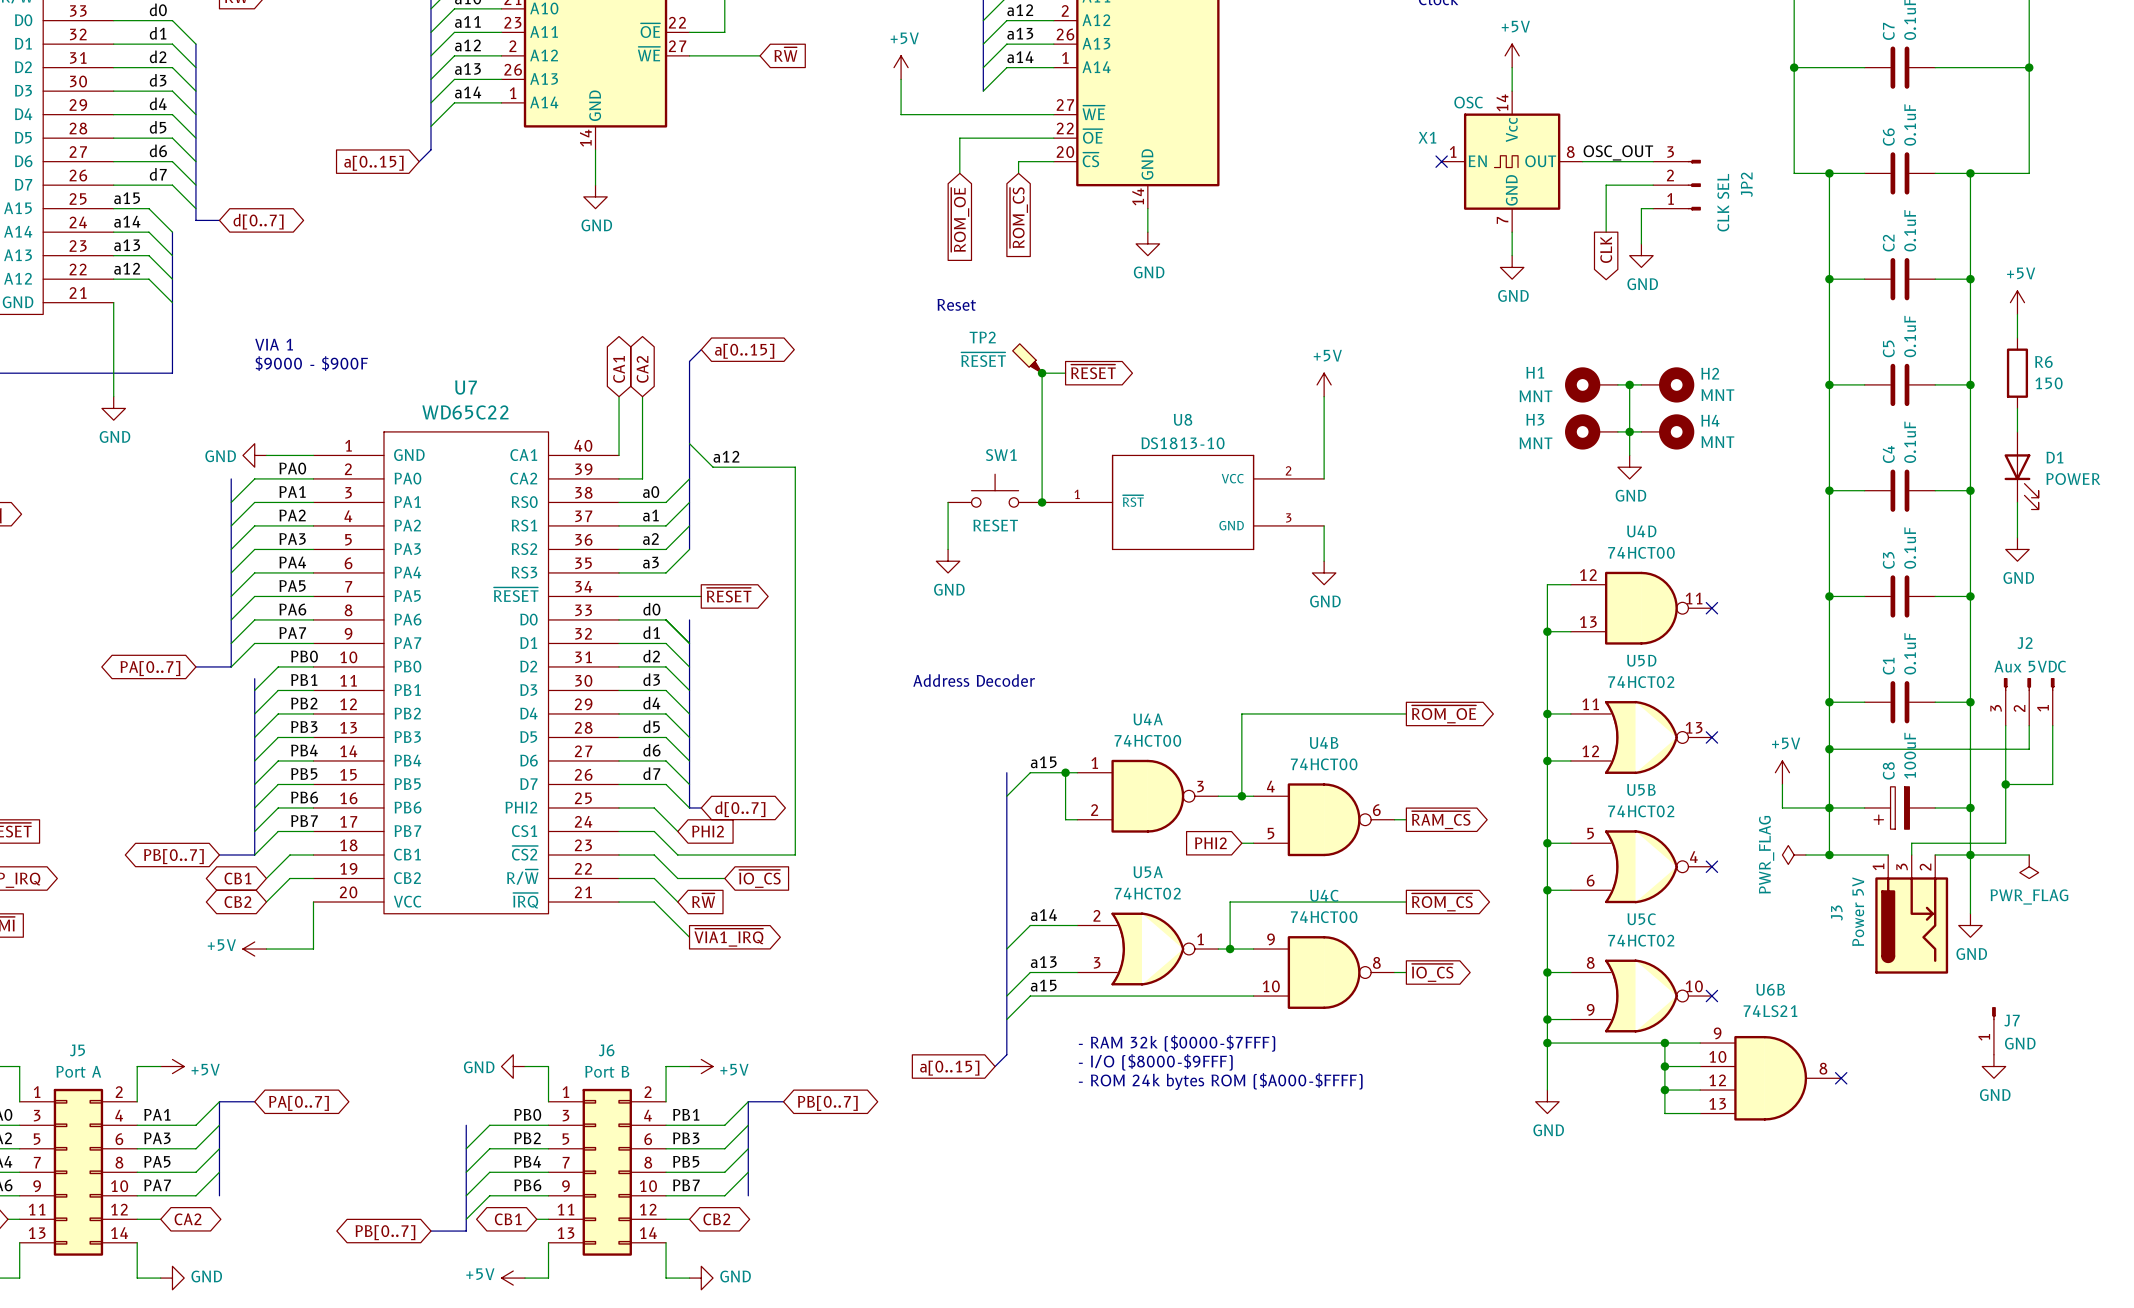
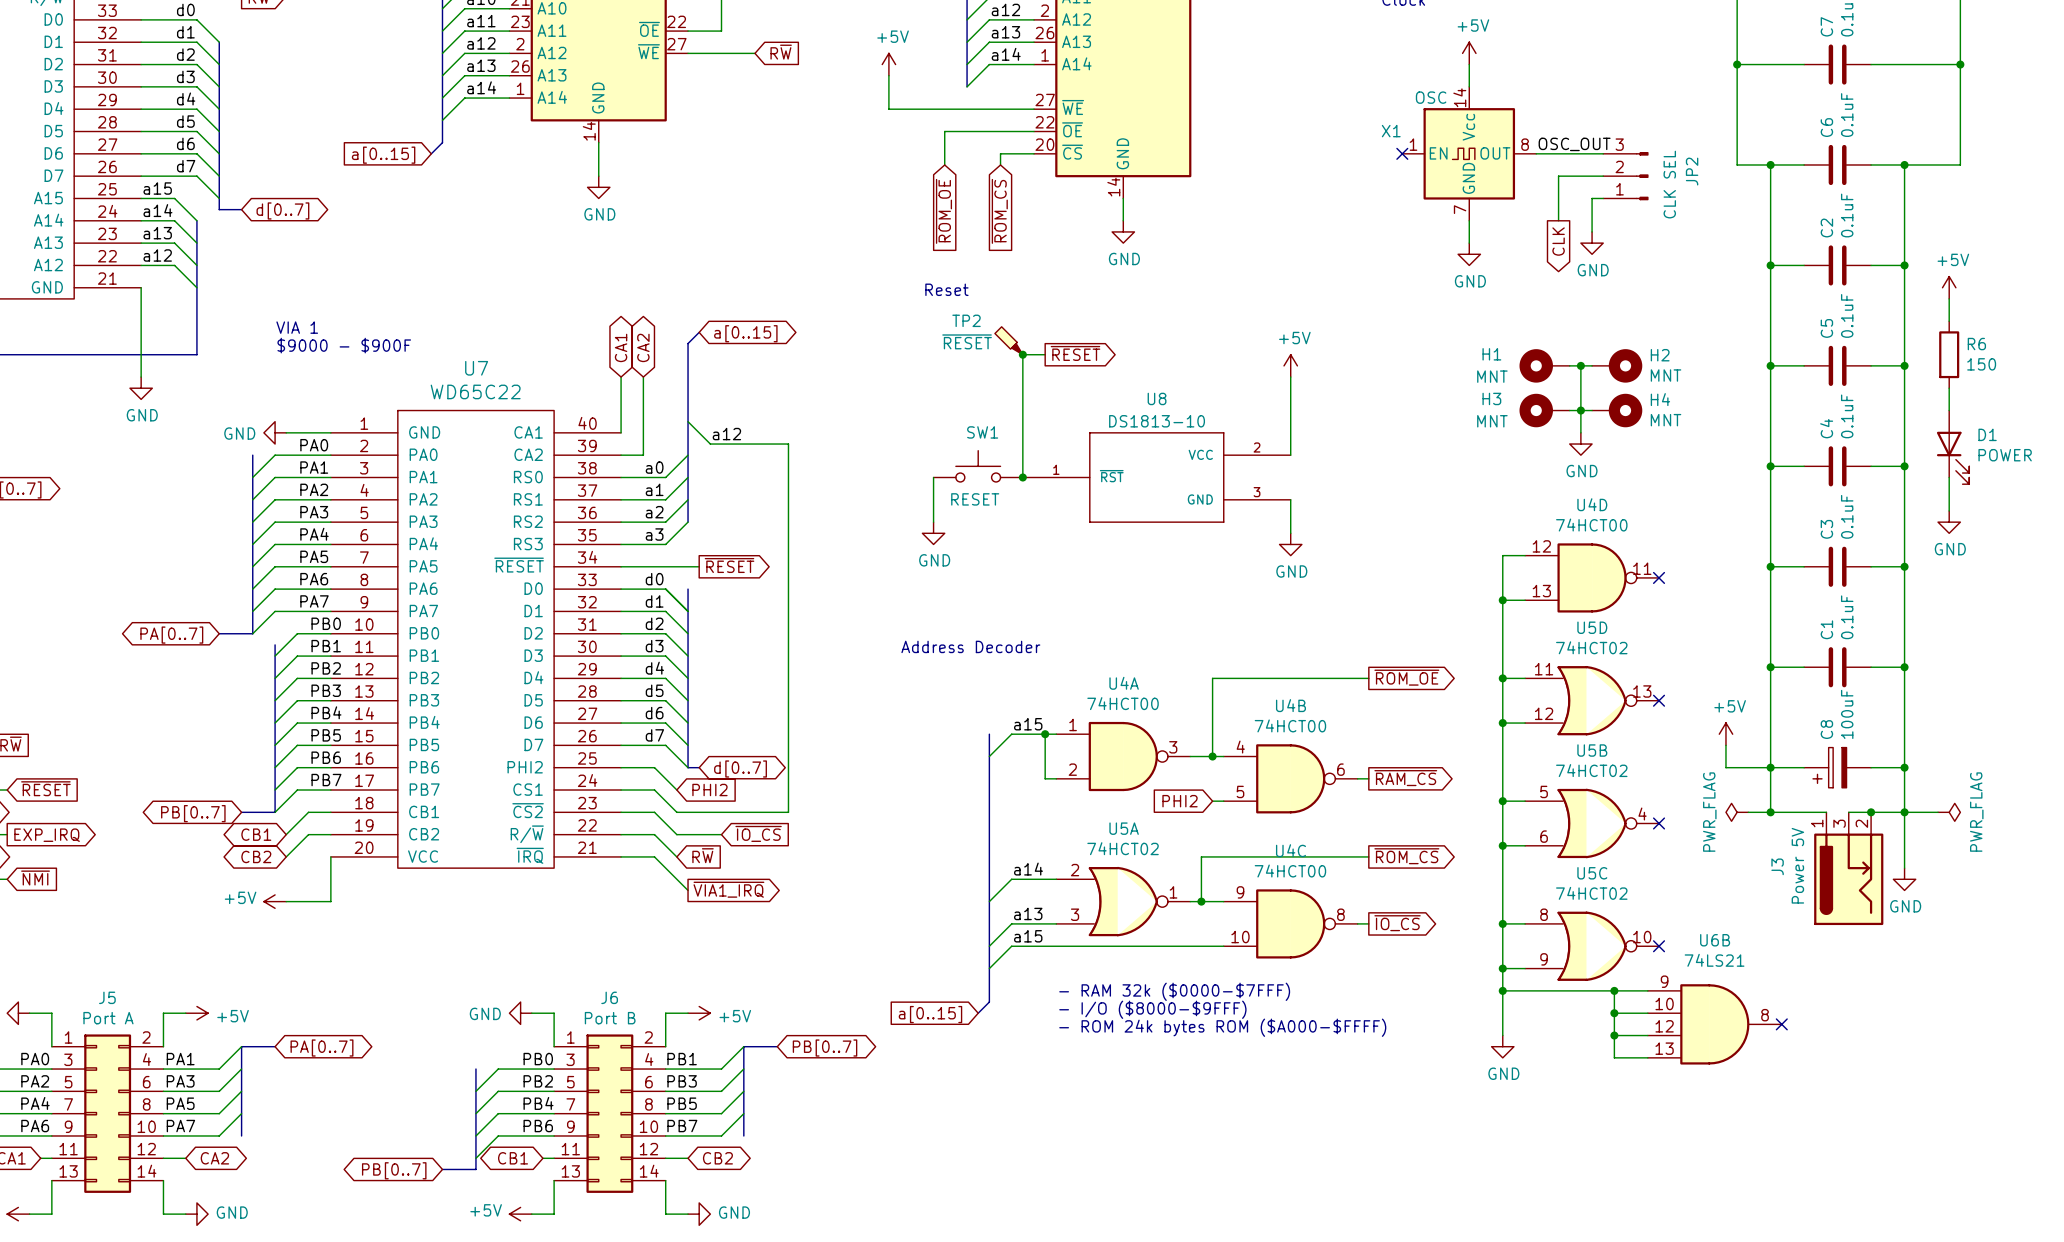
J2: Aux 5VDC (2029, 701) -> none
wire: (2005, 725) (2005, 843) (1911, 843) (1911, 854) -> (1871, 812) (1848, 812)
wire: (2029, 725) (2029, 749) (1829, 749) -> none
wire: (2052, 725) (2052, 784) (2005, 784) -> none
junction: (1829, 749) -> none
junction: (2005, 784) -> none
junction: none -> (1871, 812)
power symbol rotation: 0° (2029, 866) -> 90° counterclockwise (1949, 812)
power symbol position: PWR_FLAG (2029, 866) -> PWR_FLAG (1949, 812)
J7: GND (1993, 1030) -> none
power symbol: GND (1993, 1066) -> none

